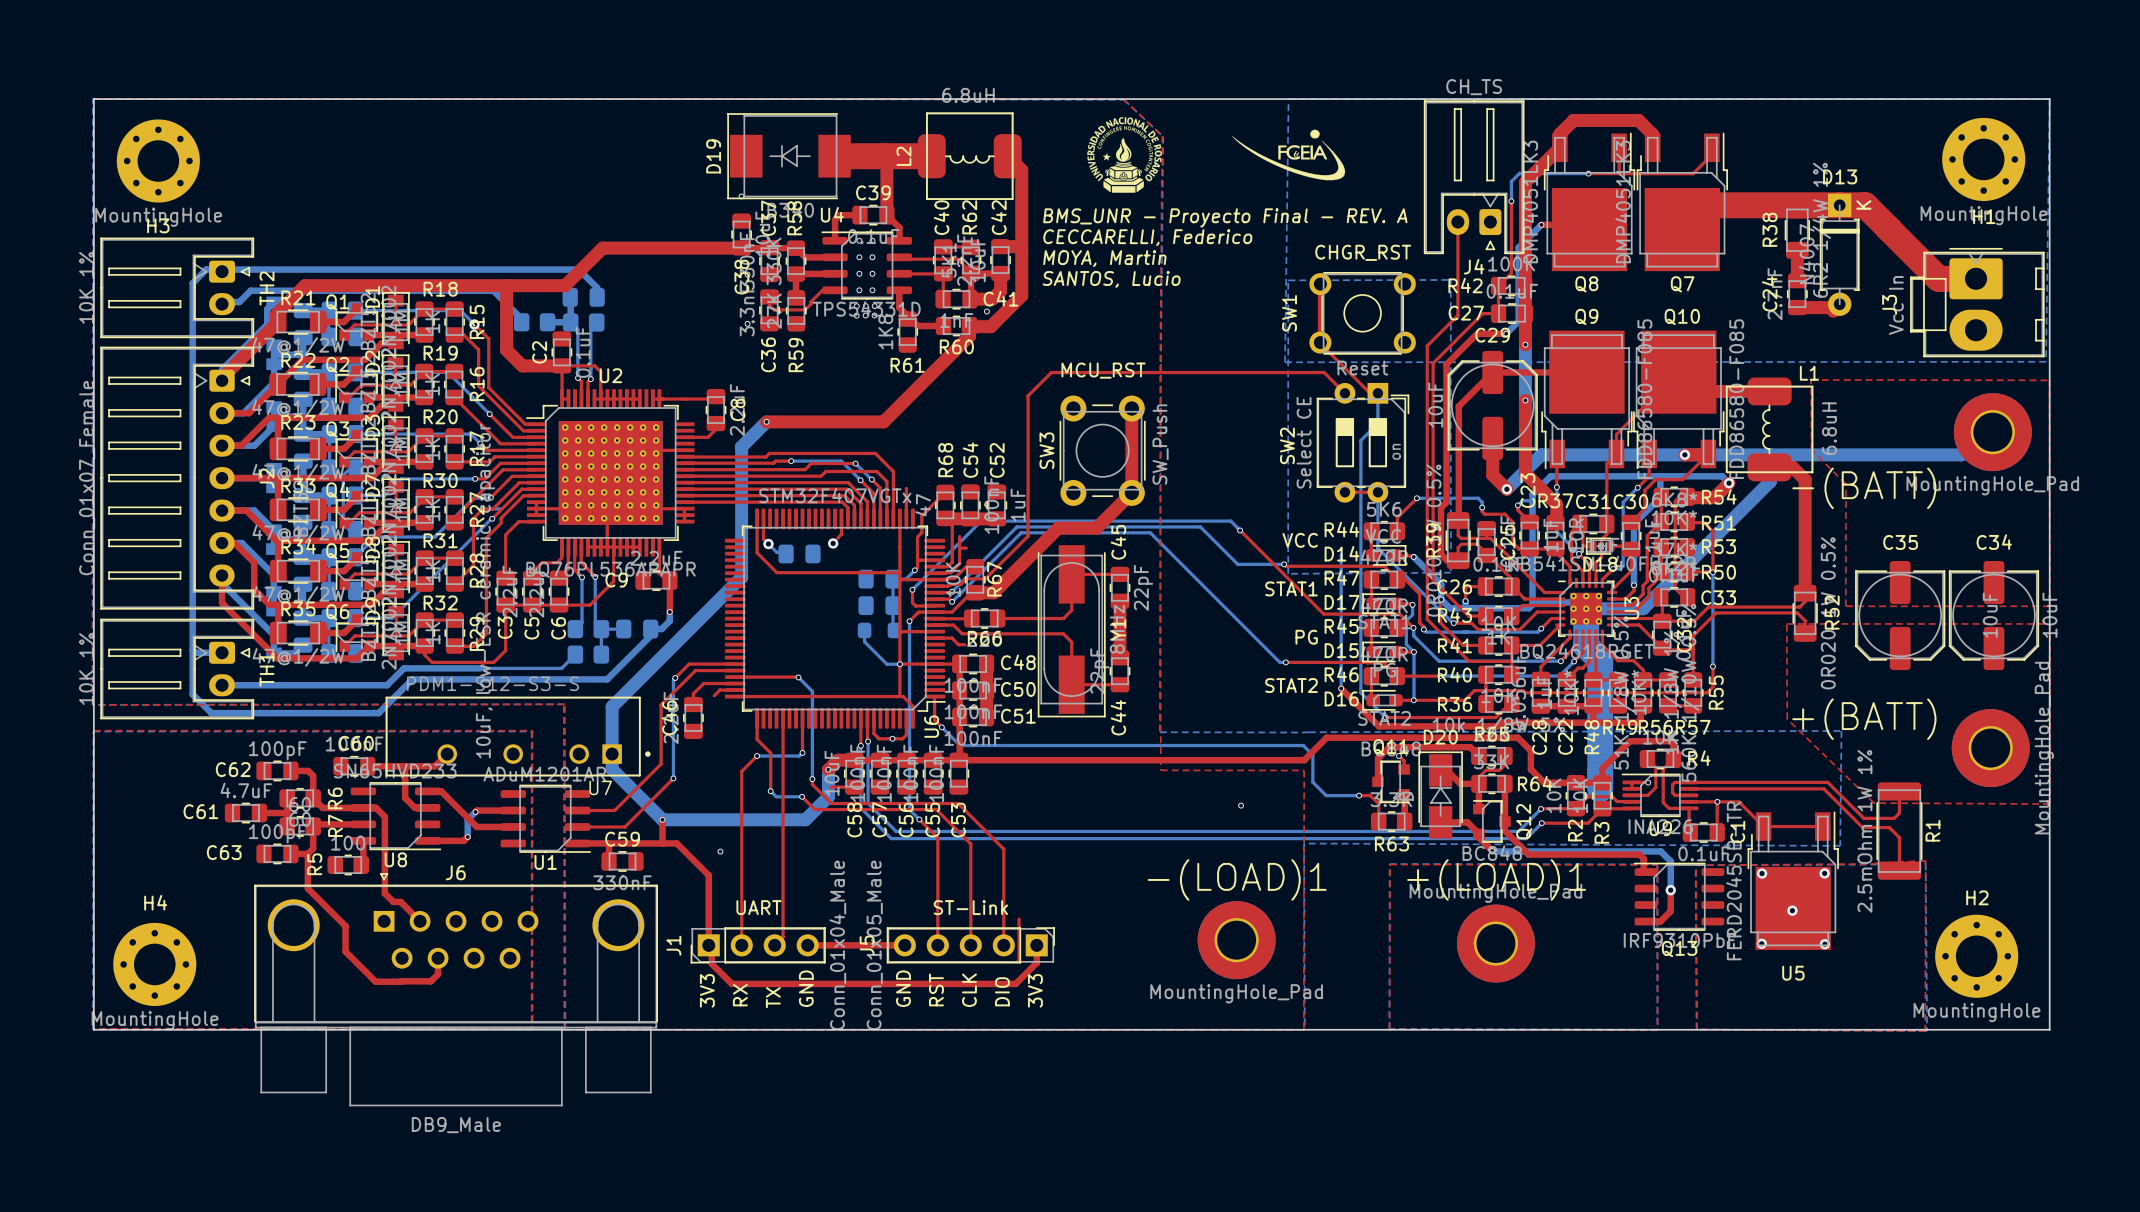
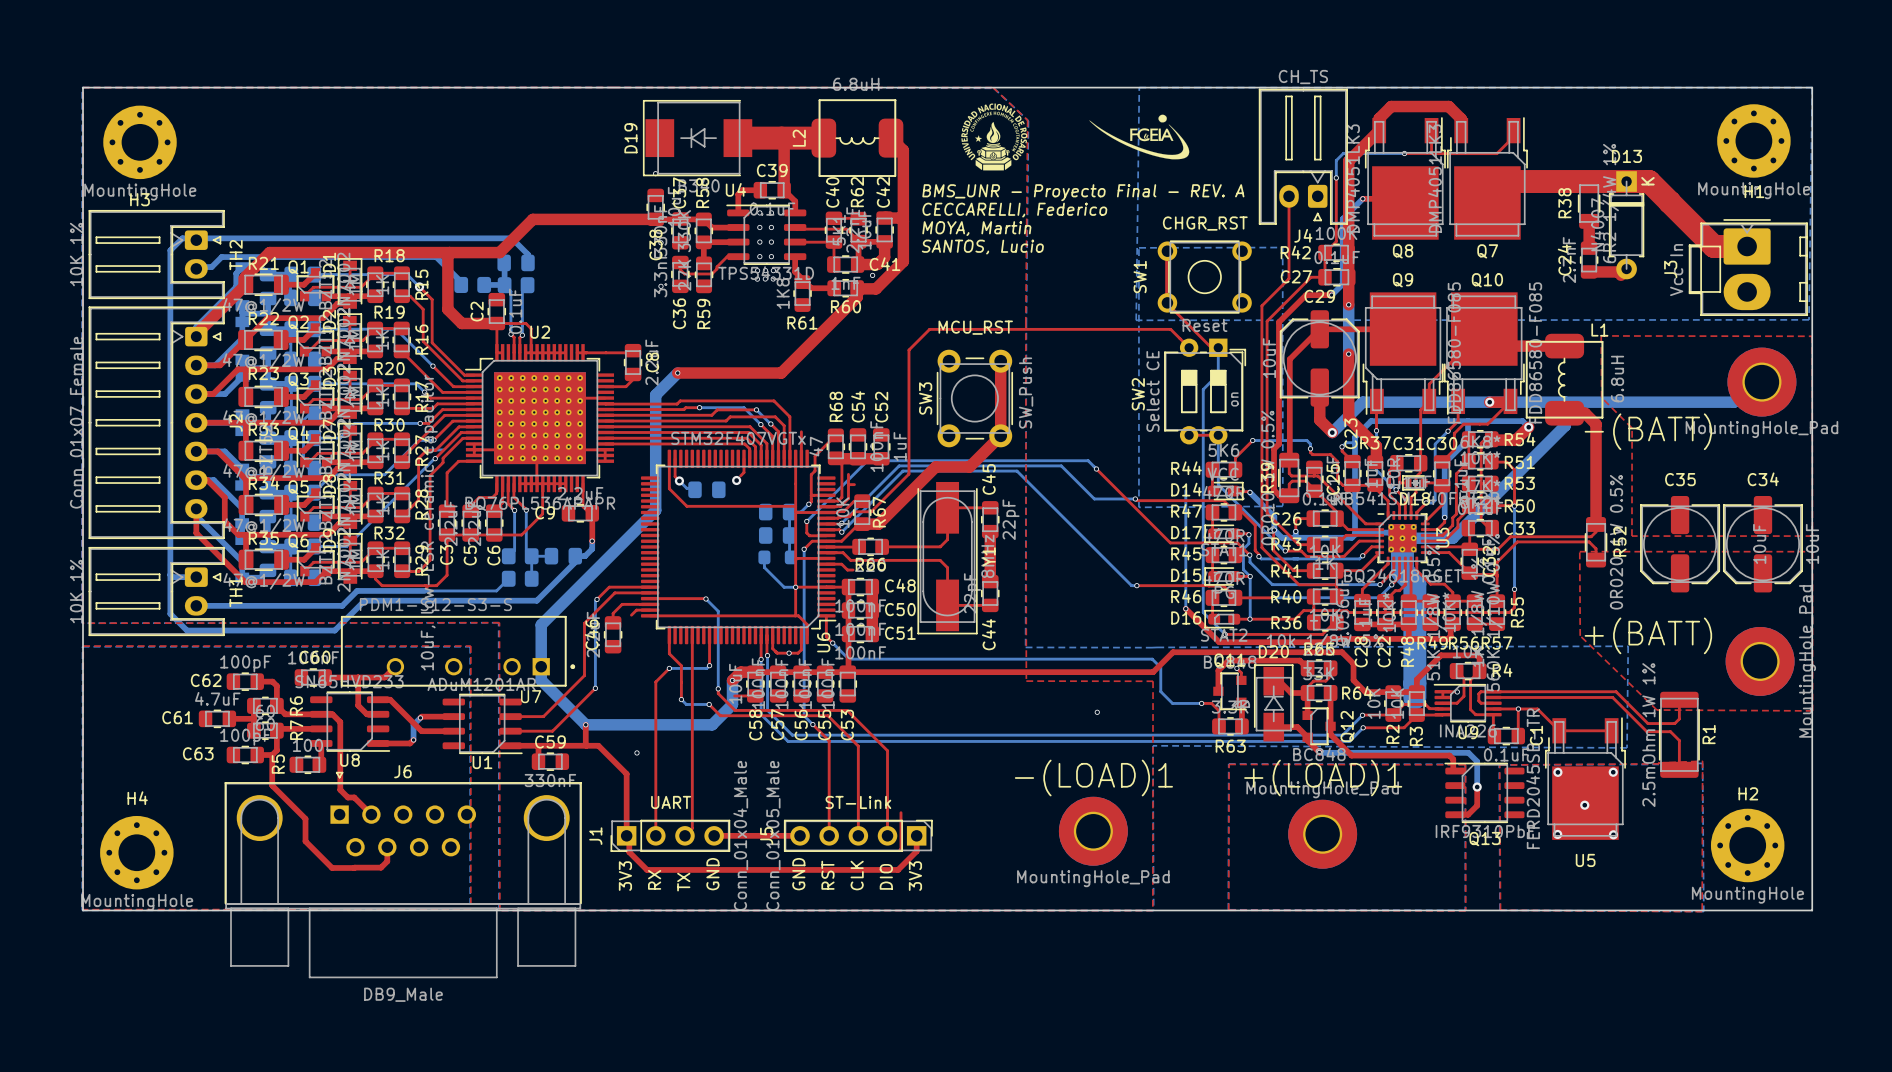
text: VCC (1300, 540) -> none
text: STAT1 (1291, 588) -> none
text: PG (1306, 637) -> none
text: STAT2 (1291, 685) -> none

